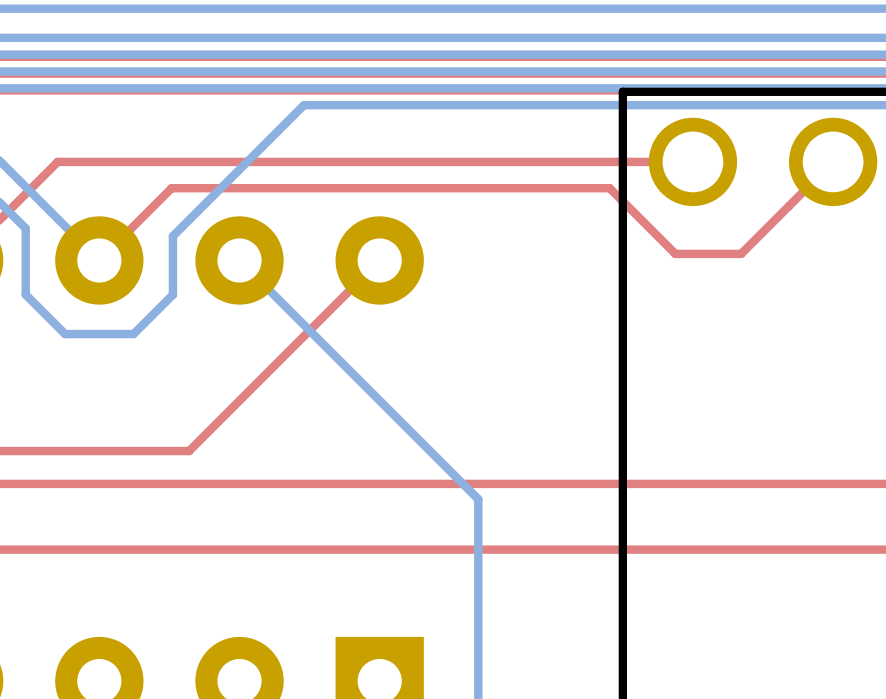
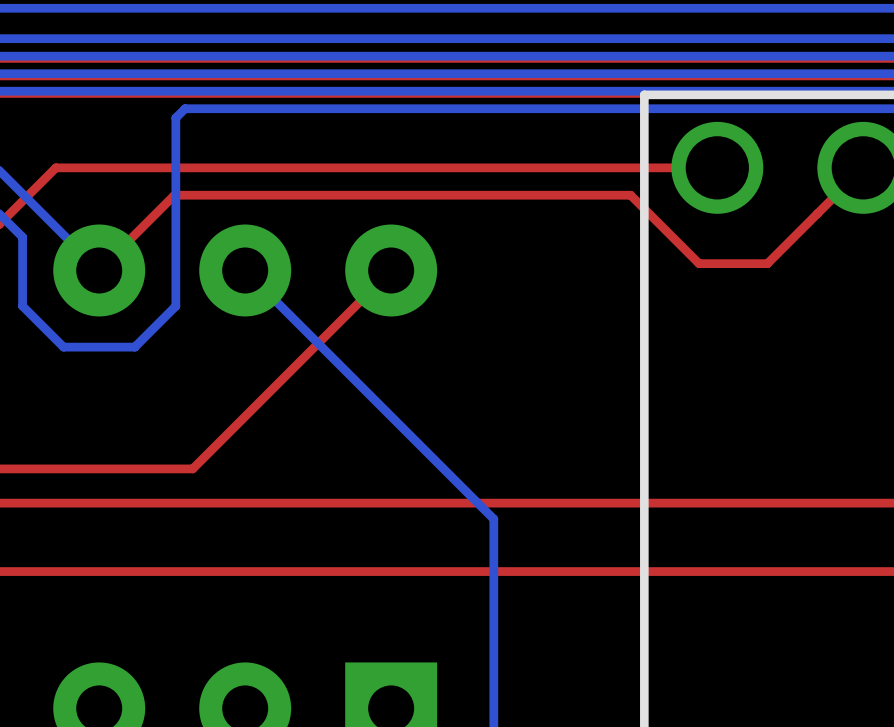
bottom track: (303, 105) (172, 236) -> (312, 108) (185, 108) (175, 117) (175, 245)

